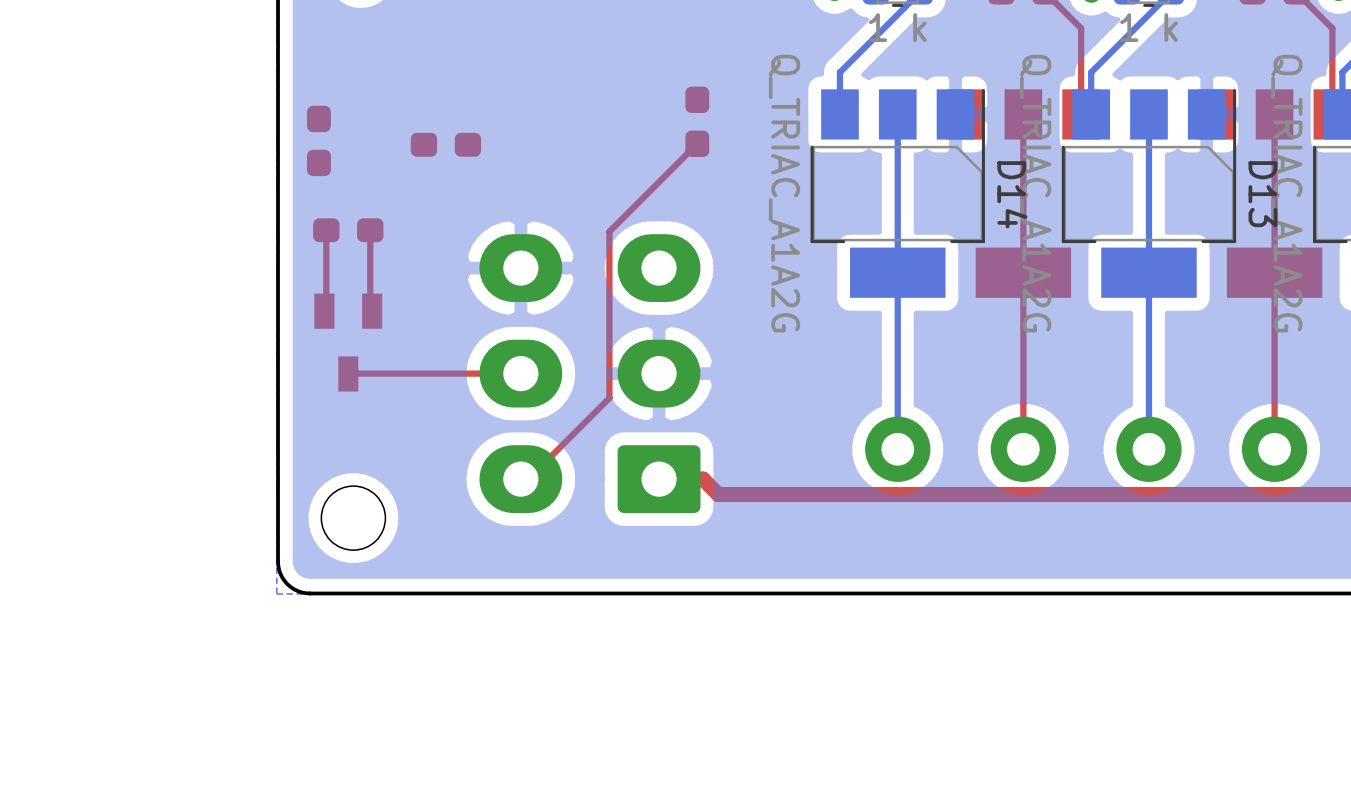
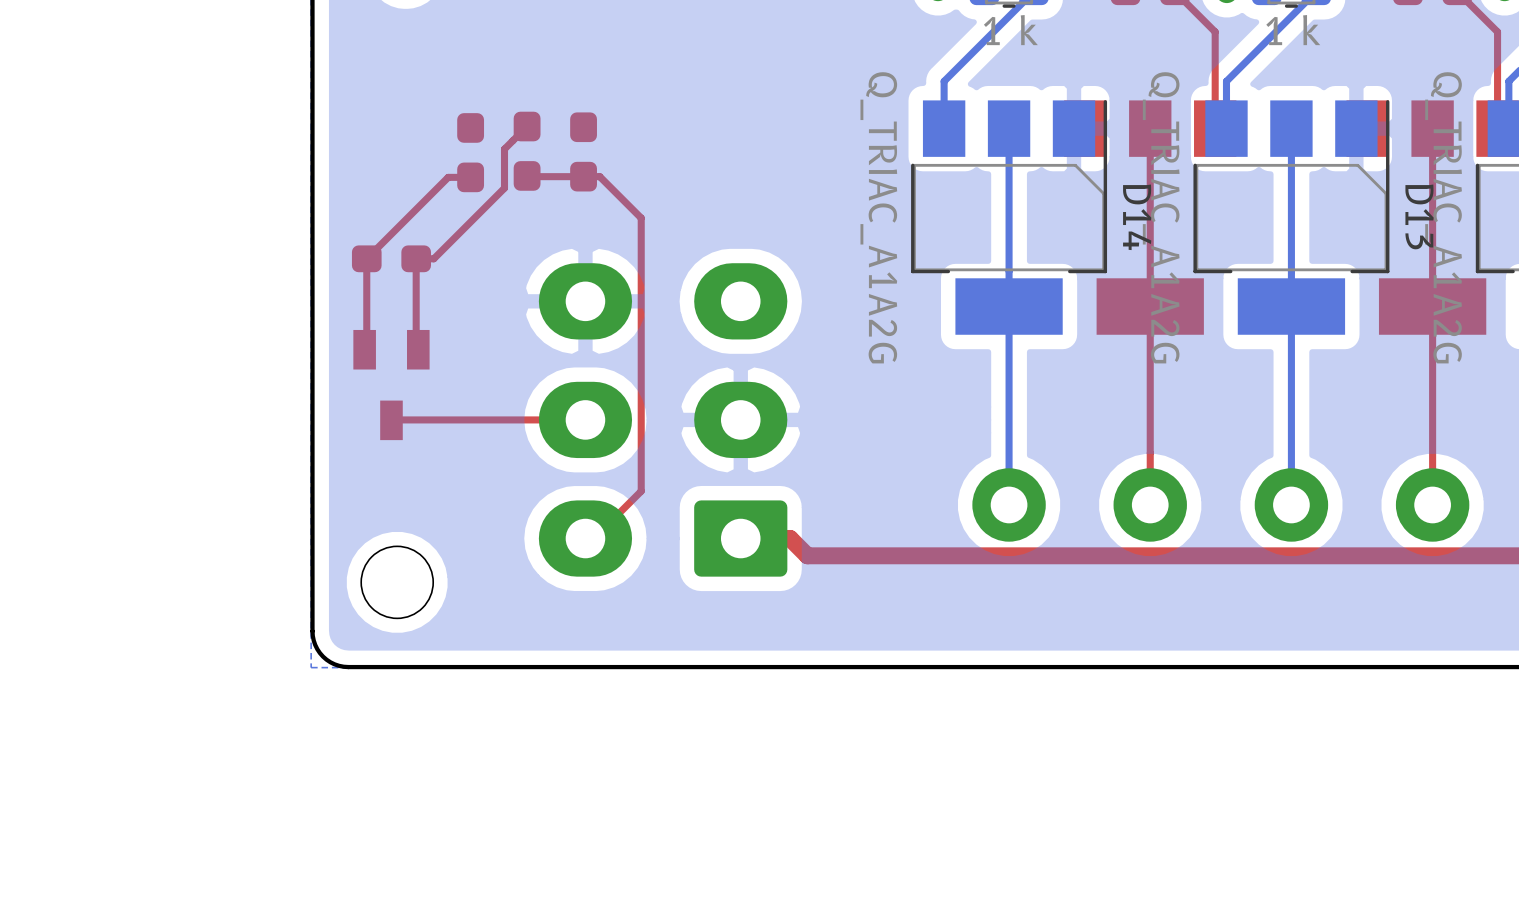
top track: none -> (527, 126) (504, 149) (504, 188) (433, 258) (416, 258)
part: (697, 121) -> none
part: none -> (527, 151)
part: none -> (470, 152)
part: none -> (583, 151)
part: (318, 140) -> none
top track: (697, 143) (609, 231) (609, 398) (570, 437) -> (527, 175) (599, 176) (641, 218) (641, 491)
part: (445, 144) -> none
top track: none -> (470, 177) (448, 177) (366, 258)

